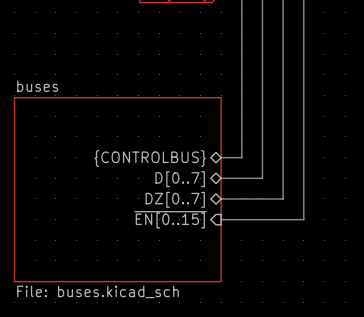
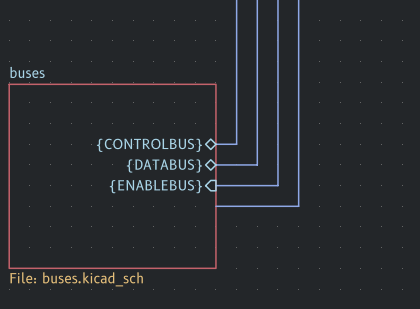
sheet pin: D[0..7] (180, 179) -> {DATABUS} (164, 165)
sheet pin shape: bidirectional (175, 199) -> input (155, 186)
sheet pin: DZ[0..7] (175, 199) -> {ENABLEBUS} (155, 186)
sheet pin: ~{EN[0..15]} (170, 219) -> none

